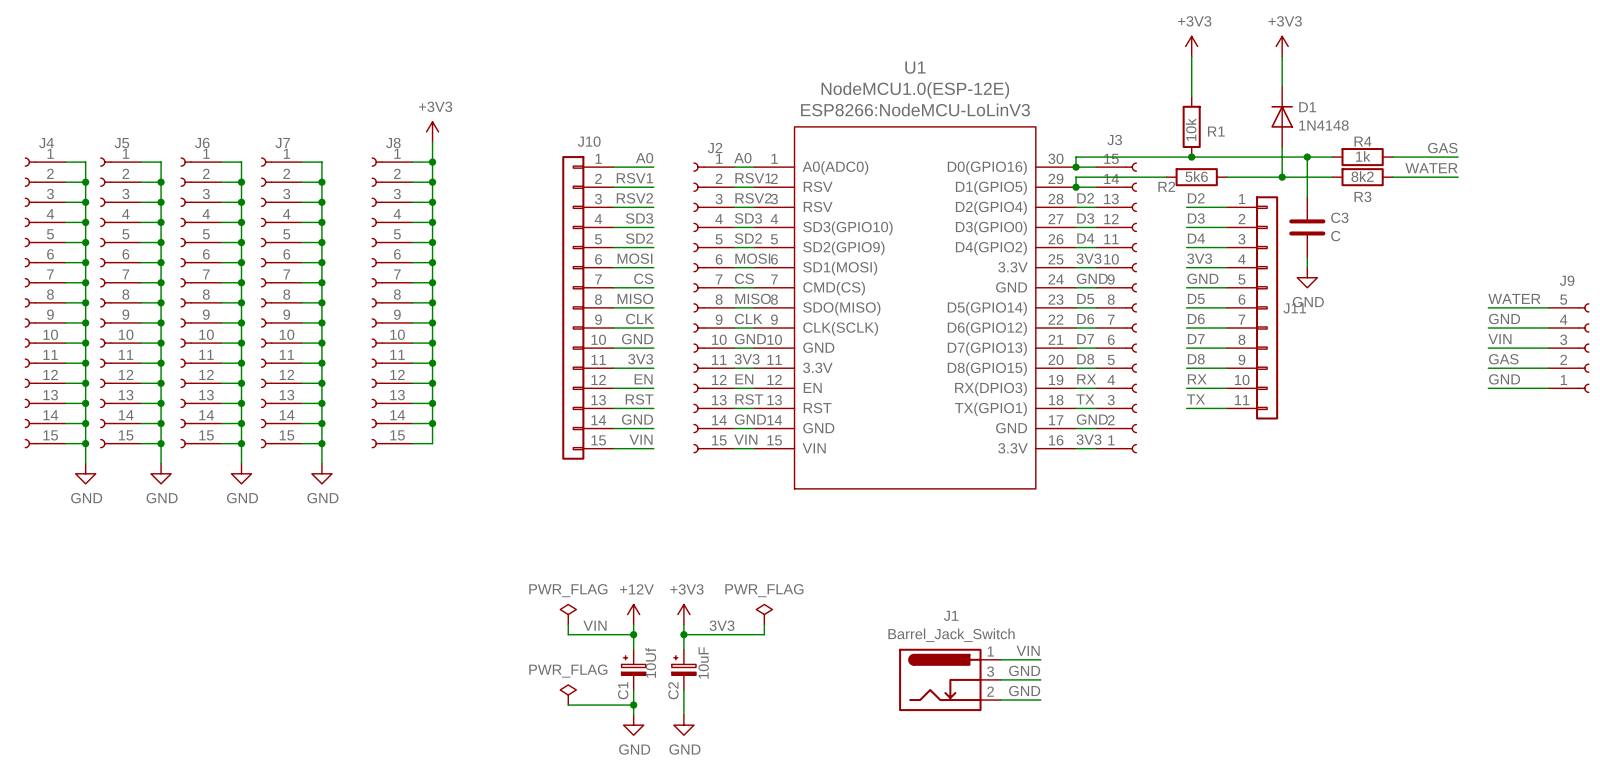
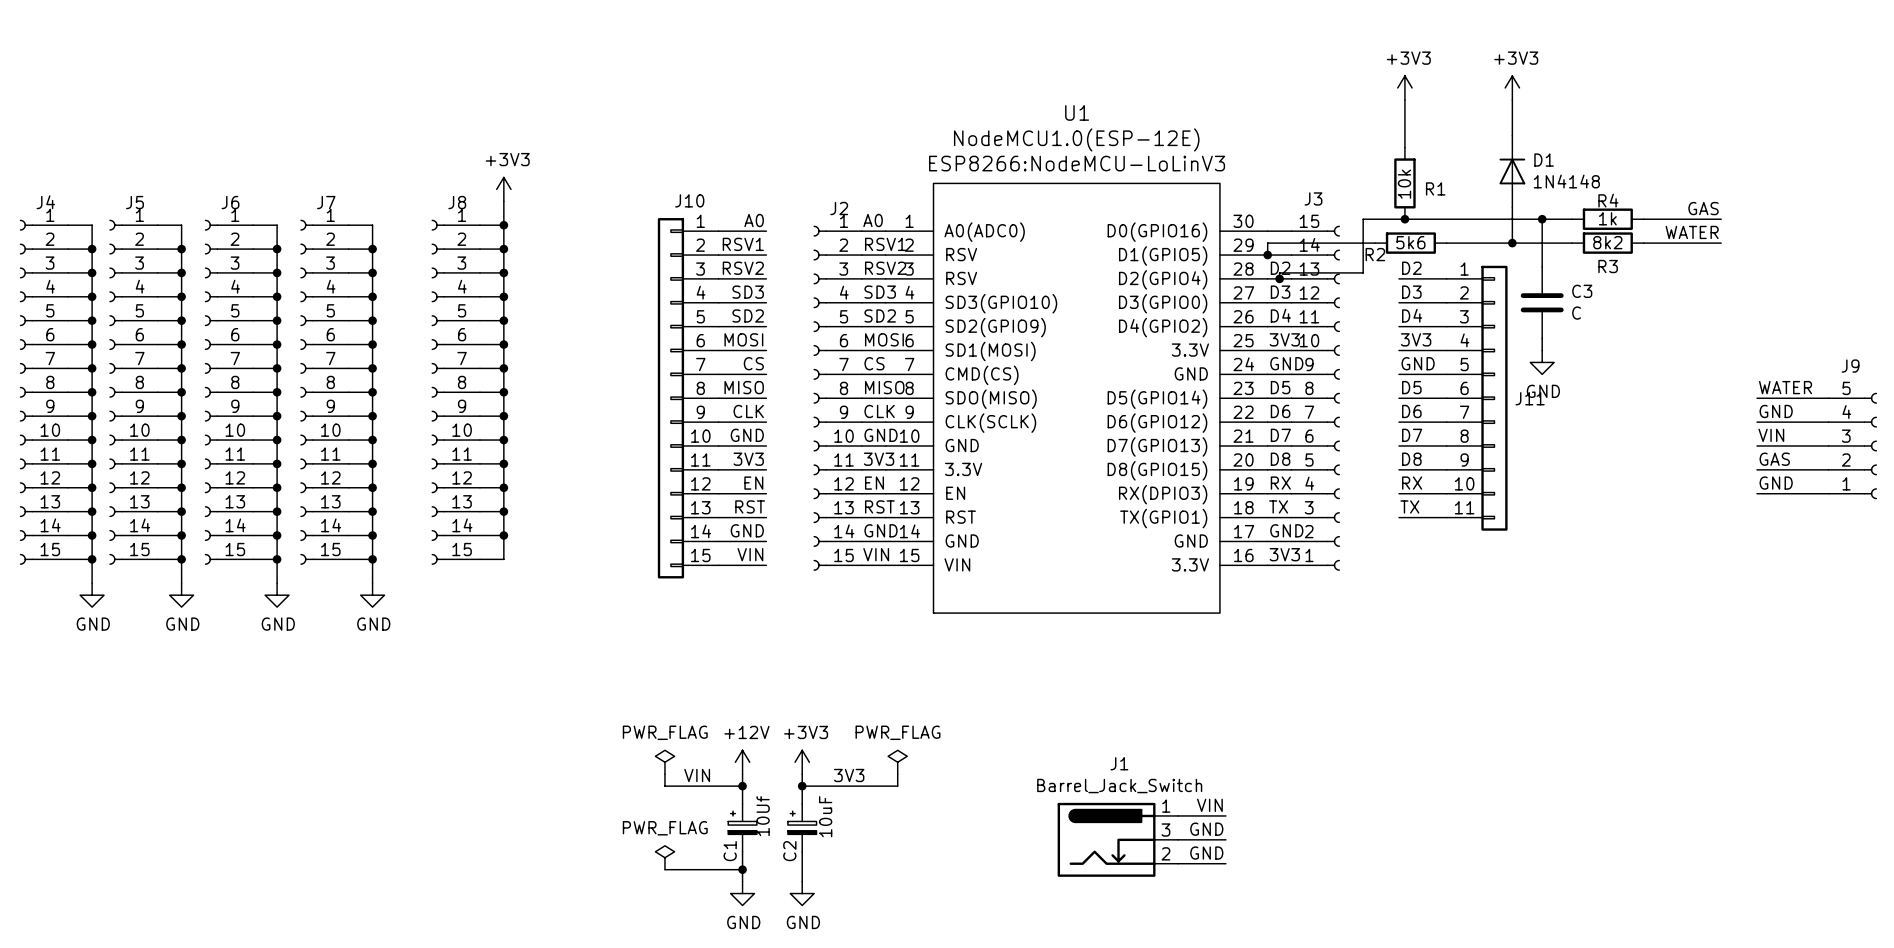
wire: (1156, 157) (1076, 157) (1076, 167) -> (1363, 219) (1363, 272) (1279, 272) (1279, 278)
junction position: (1076, 167) -> (1279, 278)

